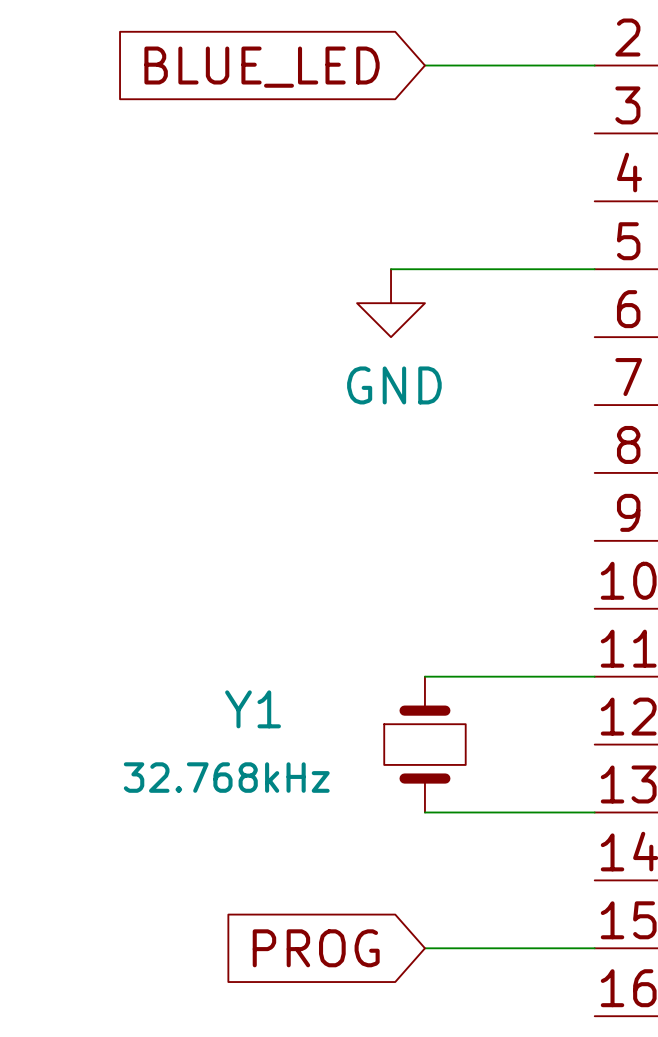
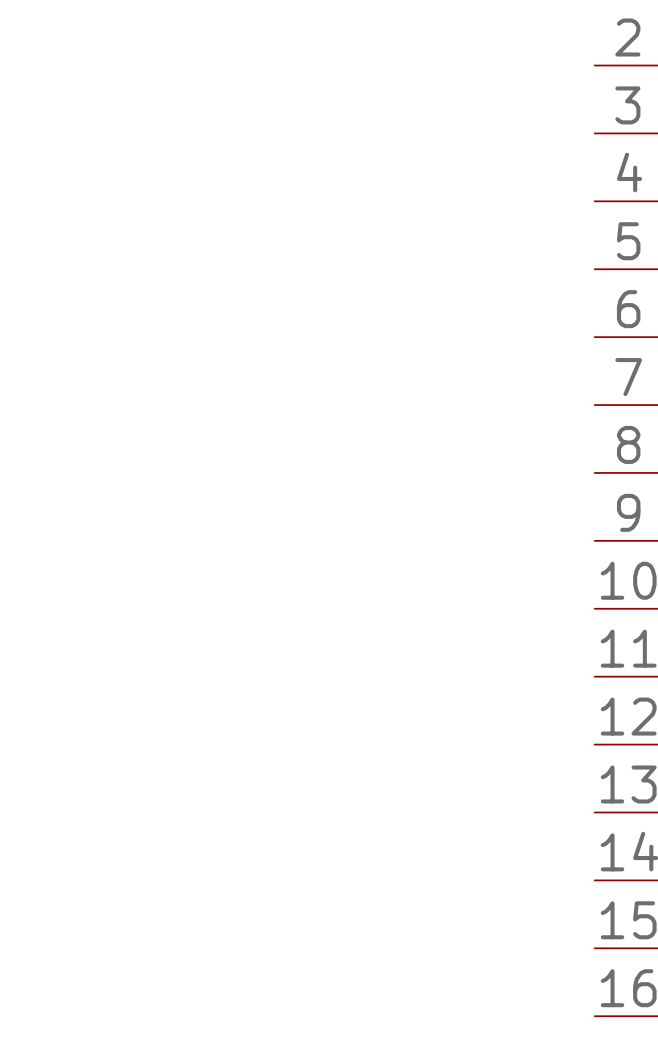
wire: (424, 65) (594, 65) -> none
global label: BLUE_LED (262, 67) -> none
wire: (391, 269) (594, 269) -> none
power symbol: GND (391, 303) -> none
wire: (424, 676) (594, 676) -> none
Y1: 32.768kHz (424, 744) -> none
wire: (424, 812) (594, 812) -> none
global label: PROG (316, 948) -> none
wire: (424, 948) (594, 948) -> none

